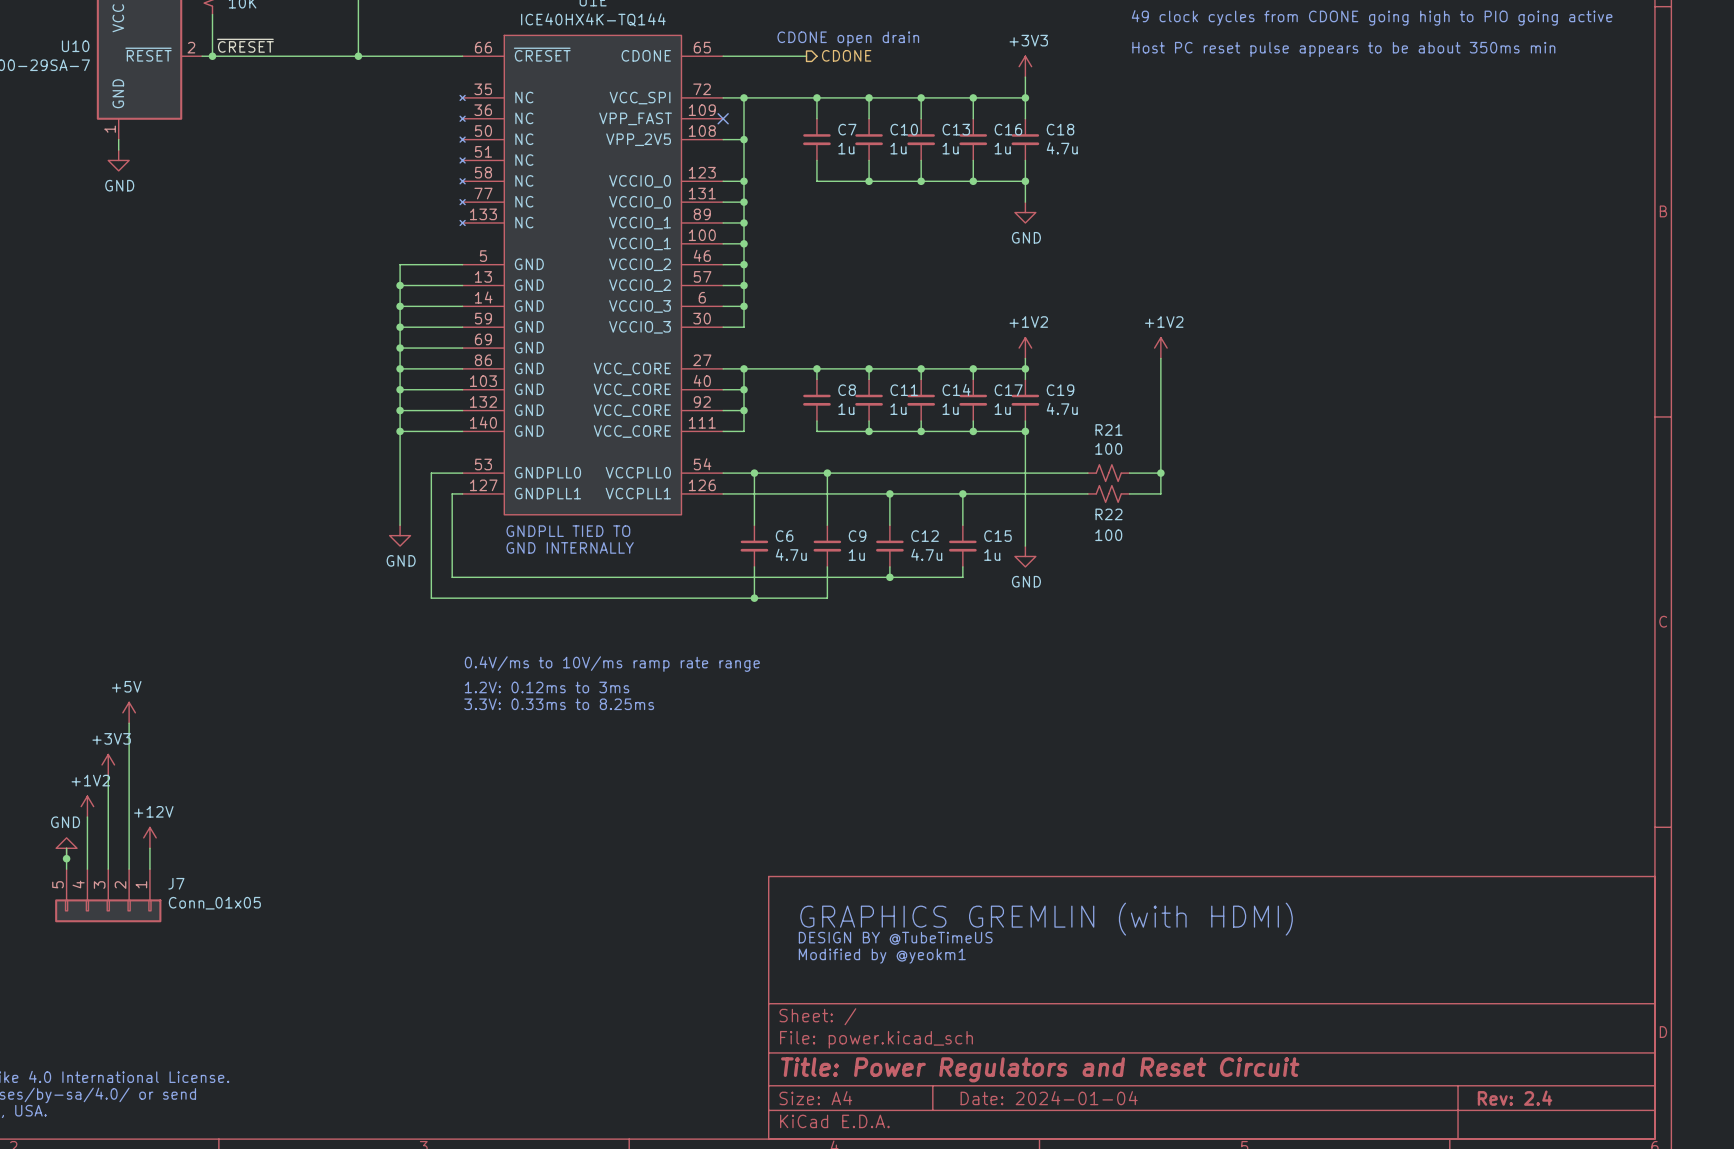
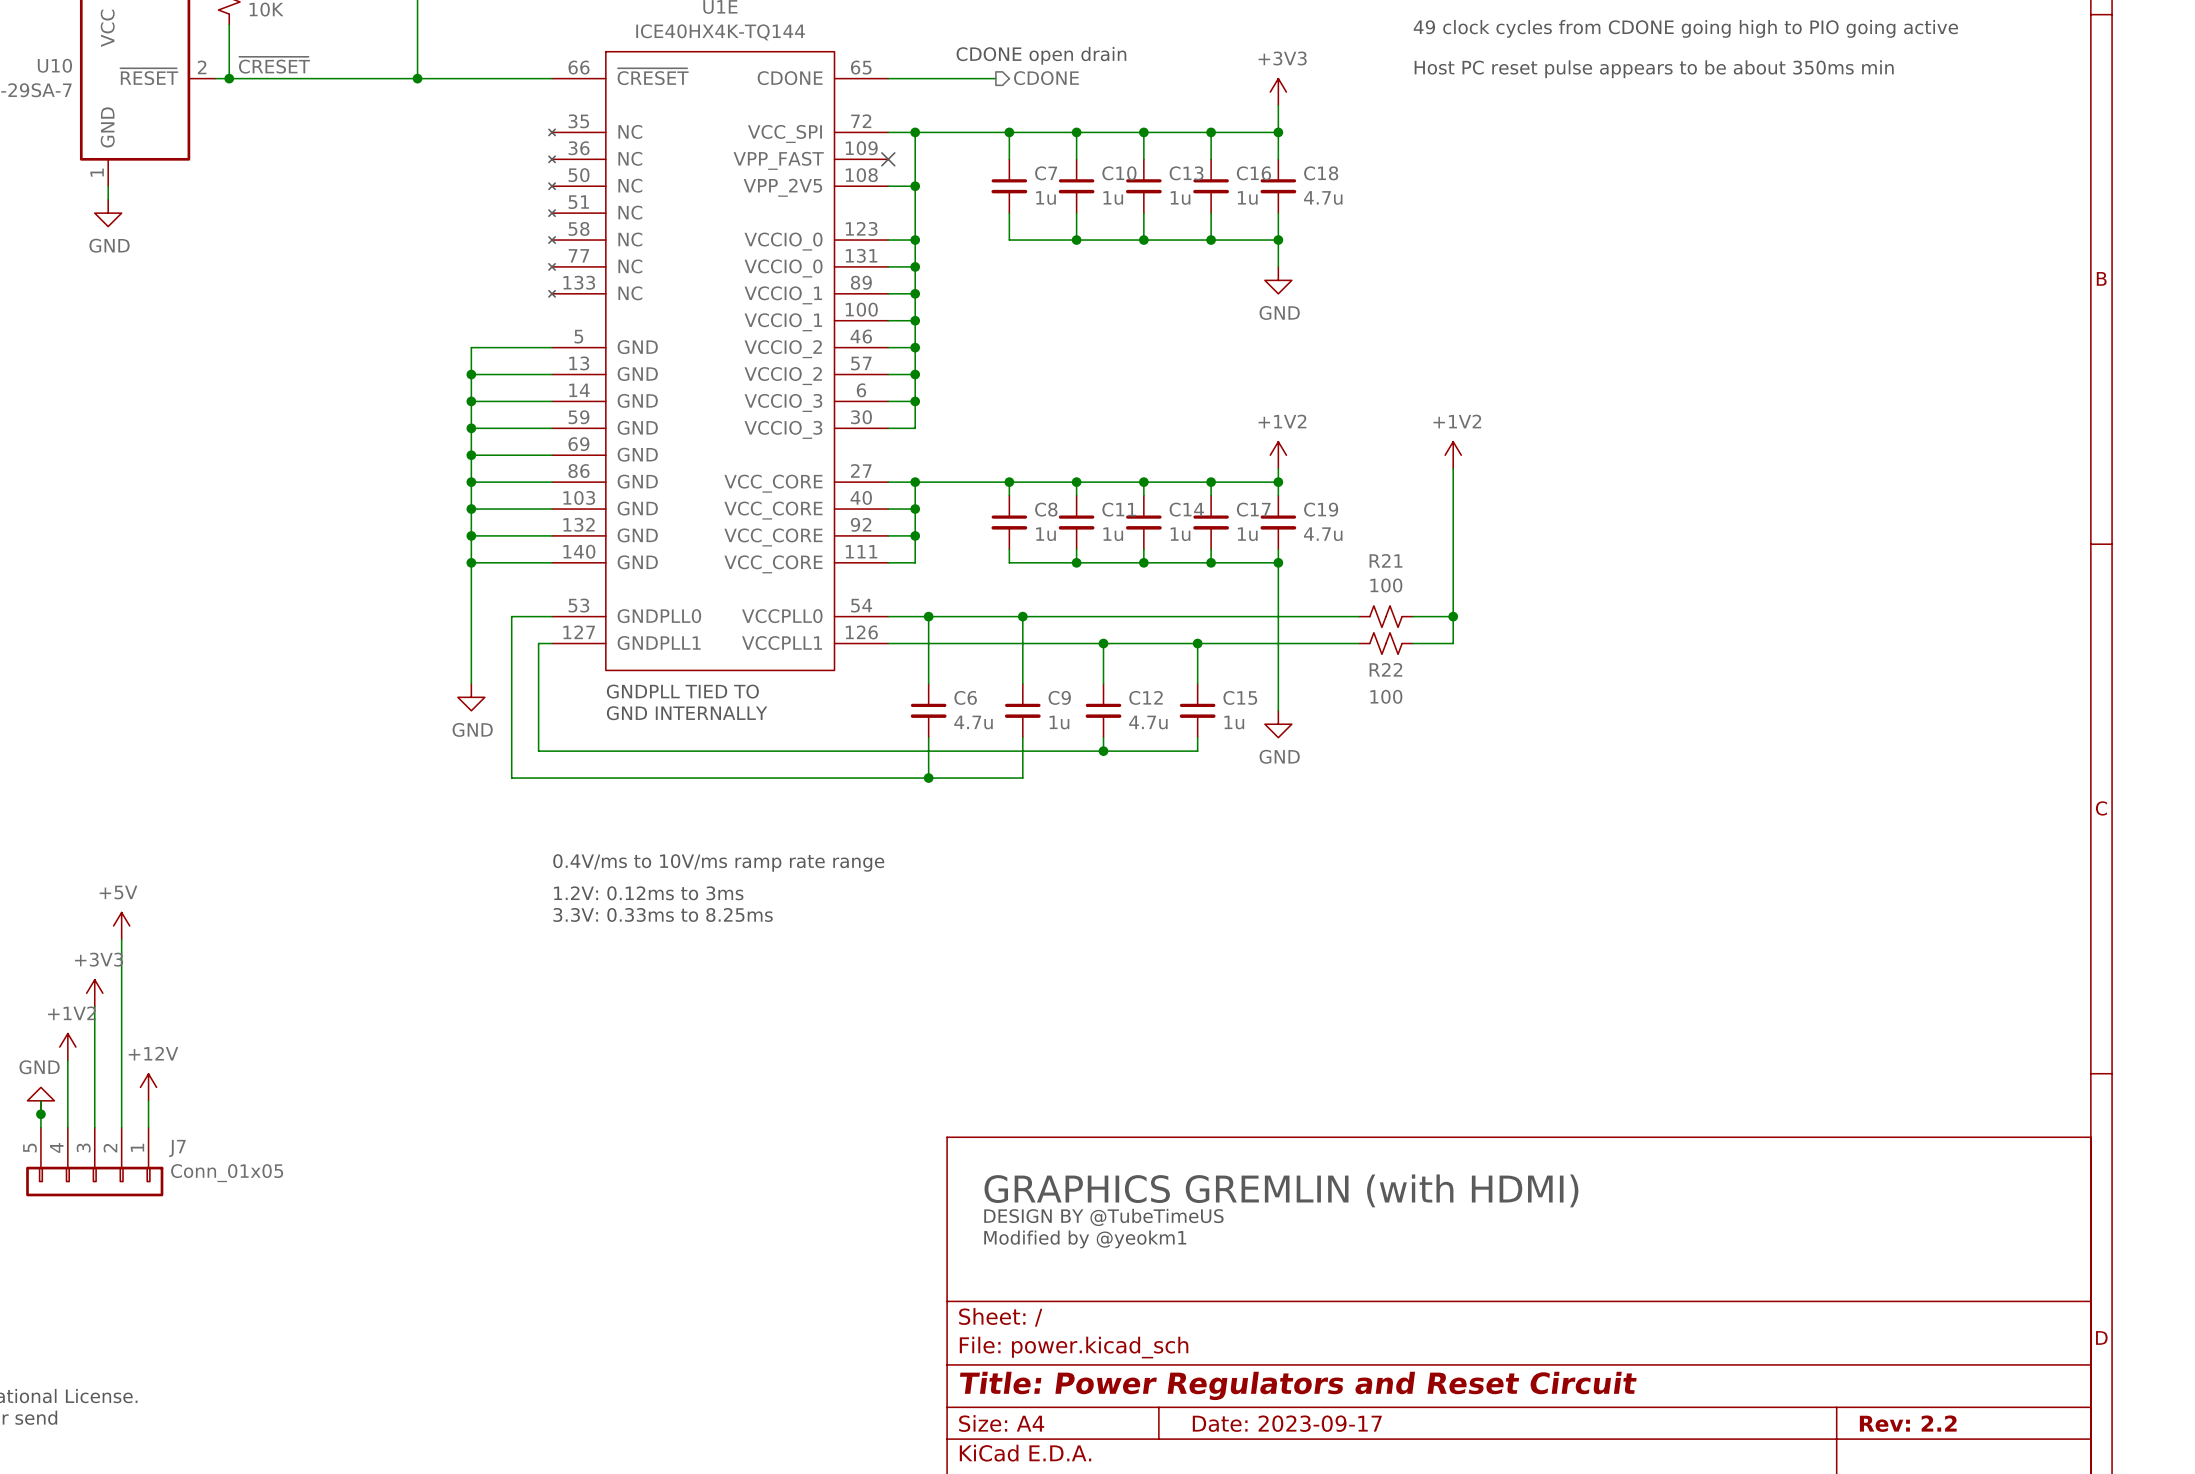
title block: Date: 2024-01-04 (1049, 1098) -> Date: 2023-09-17 (1287, 1423)
title block: Rev: 2.4 (1515, 1098) -> Rev: 2.2 (1908, 1423)

